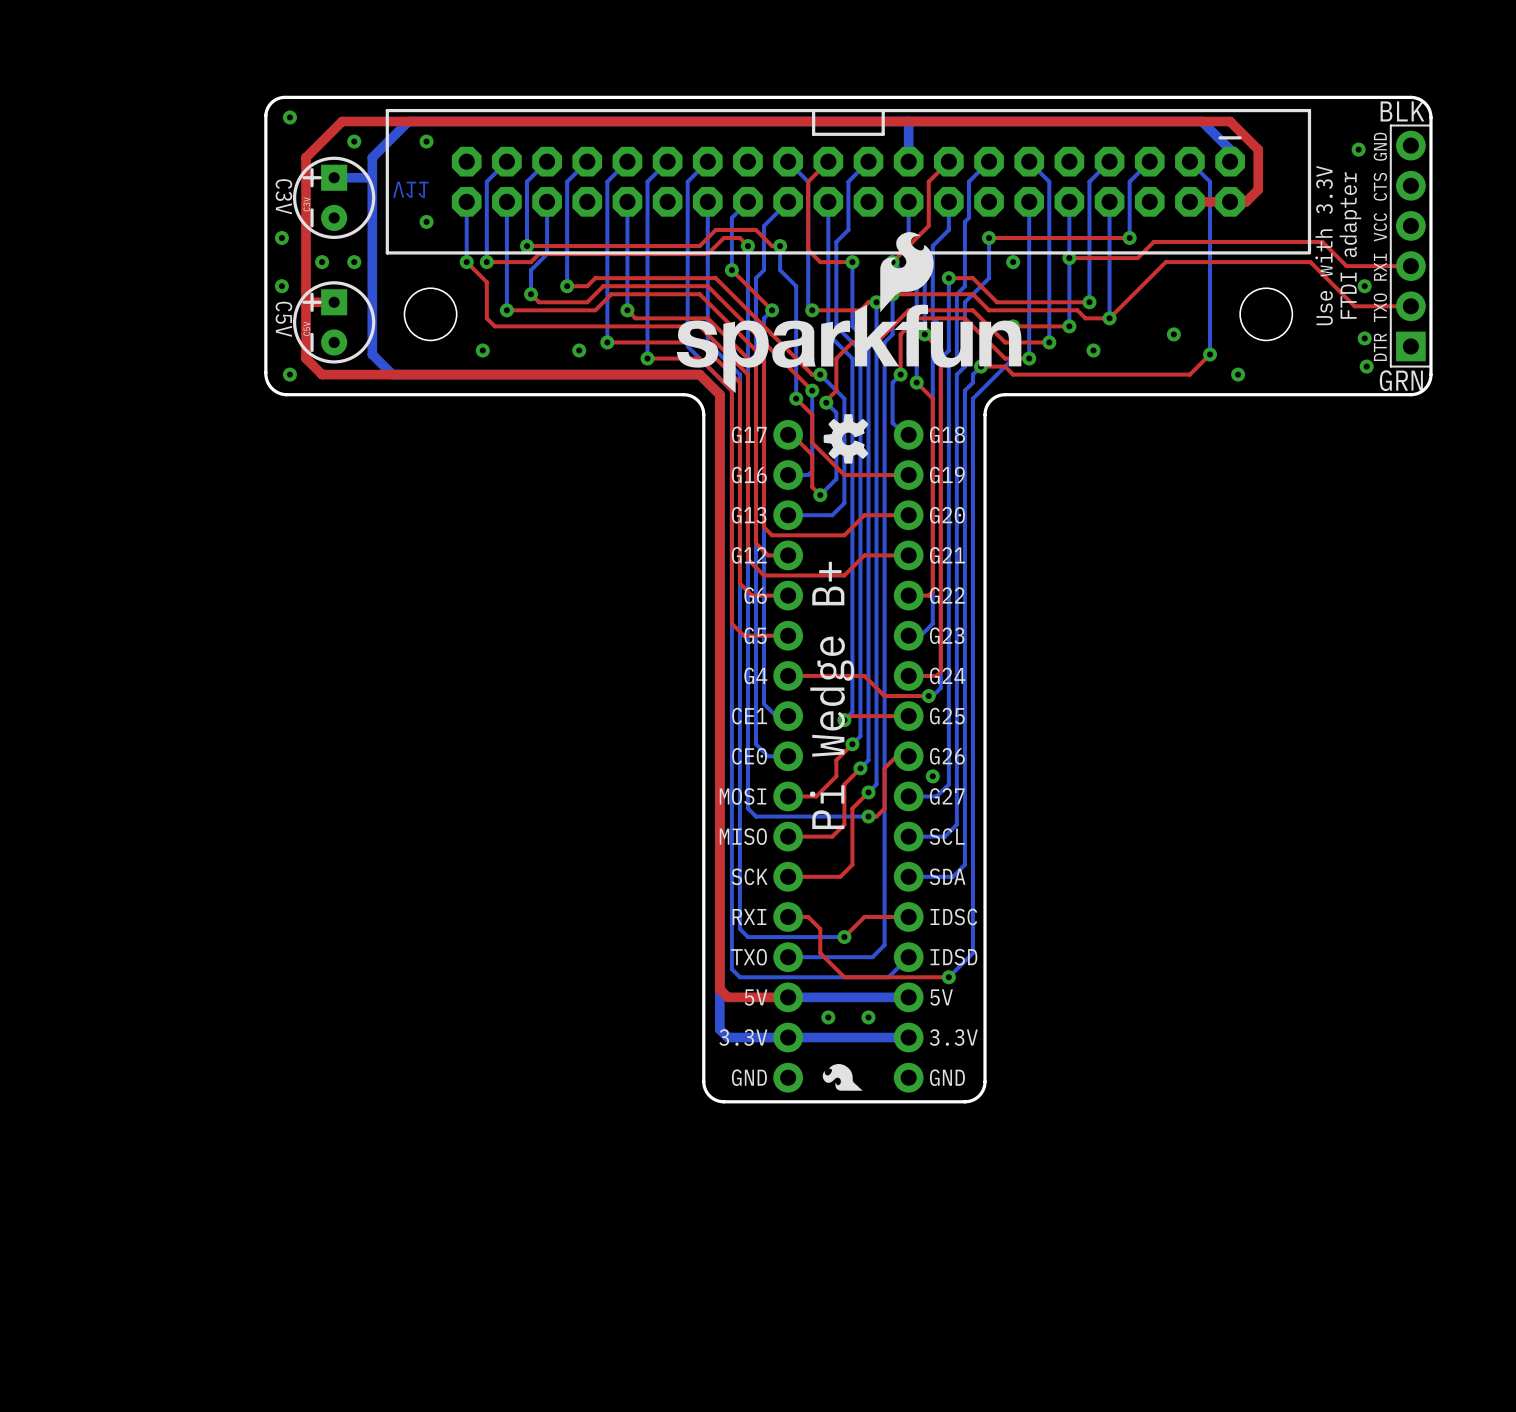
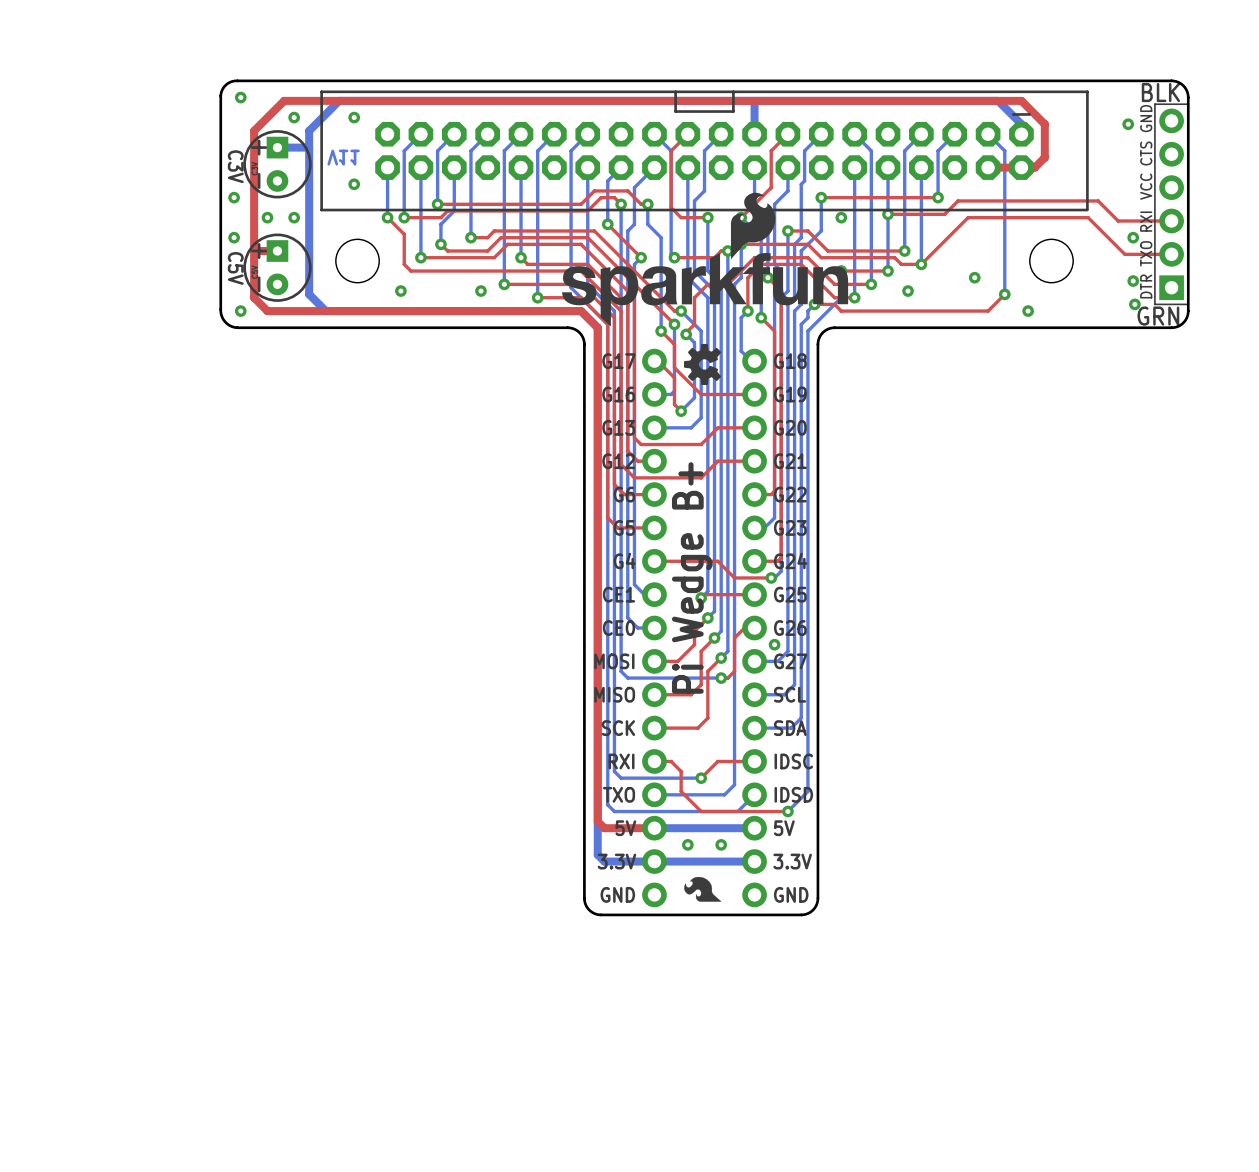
text: Use with 3.3V (1324, 245) -> none
text: FTDI adapter (1350, 245) -> none
drawing shape: [822, 1063, 863, 1091] -> [684, 876, 722, 902]

